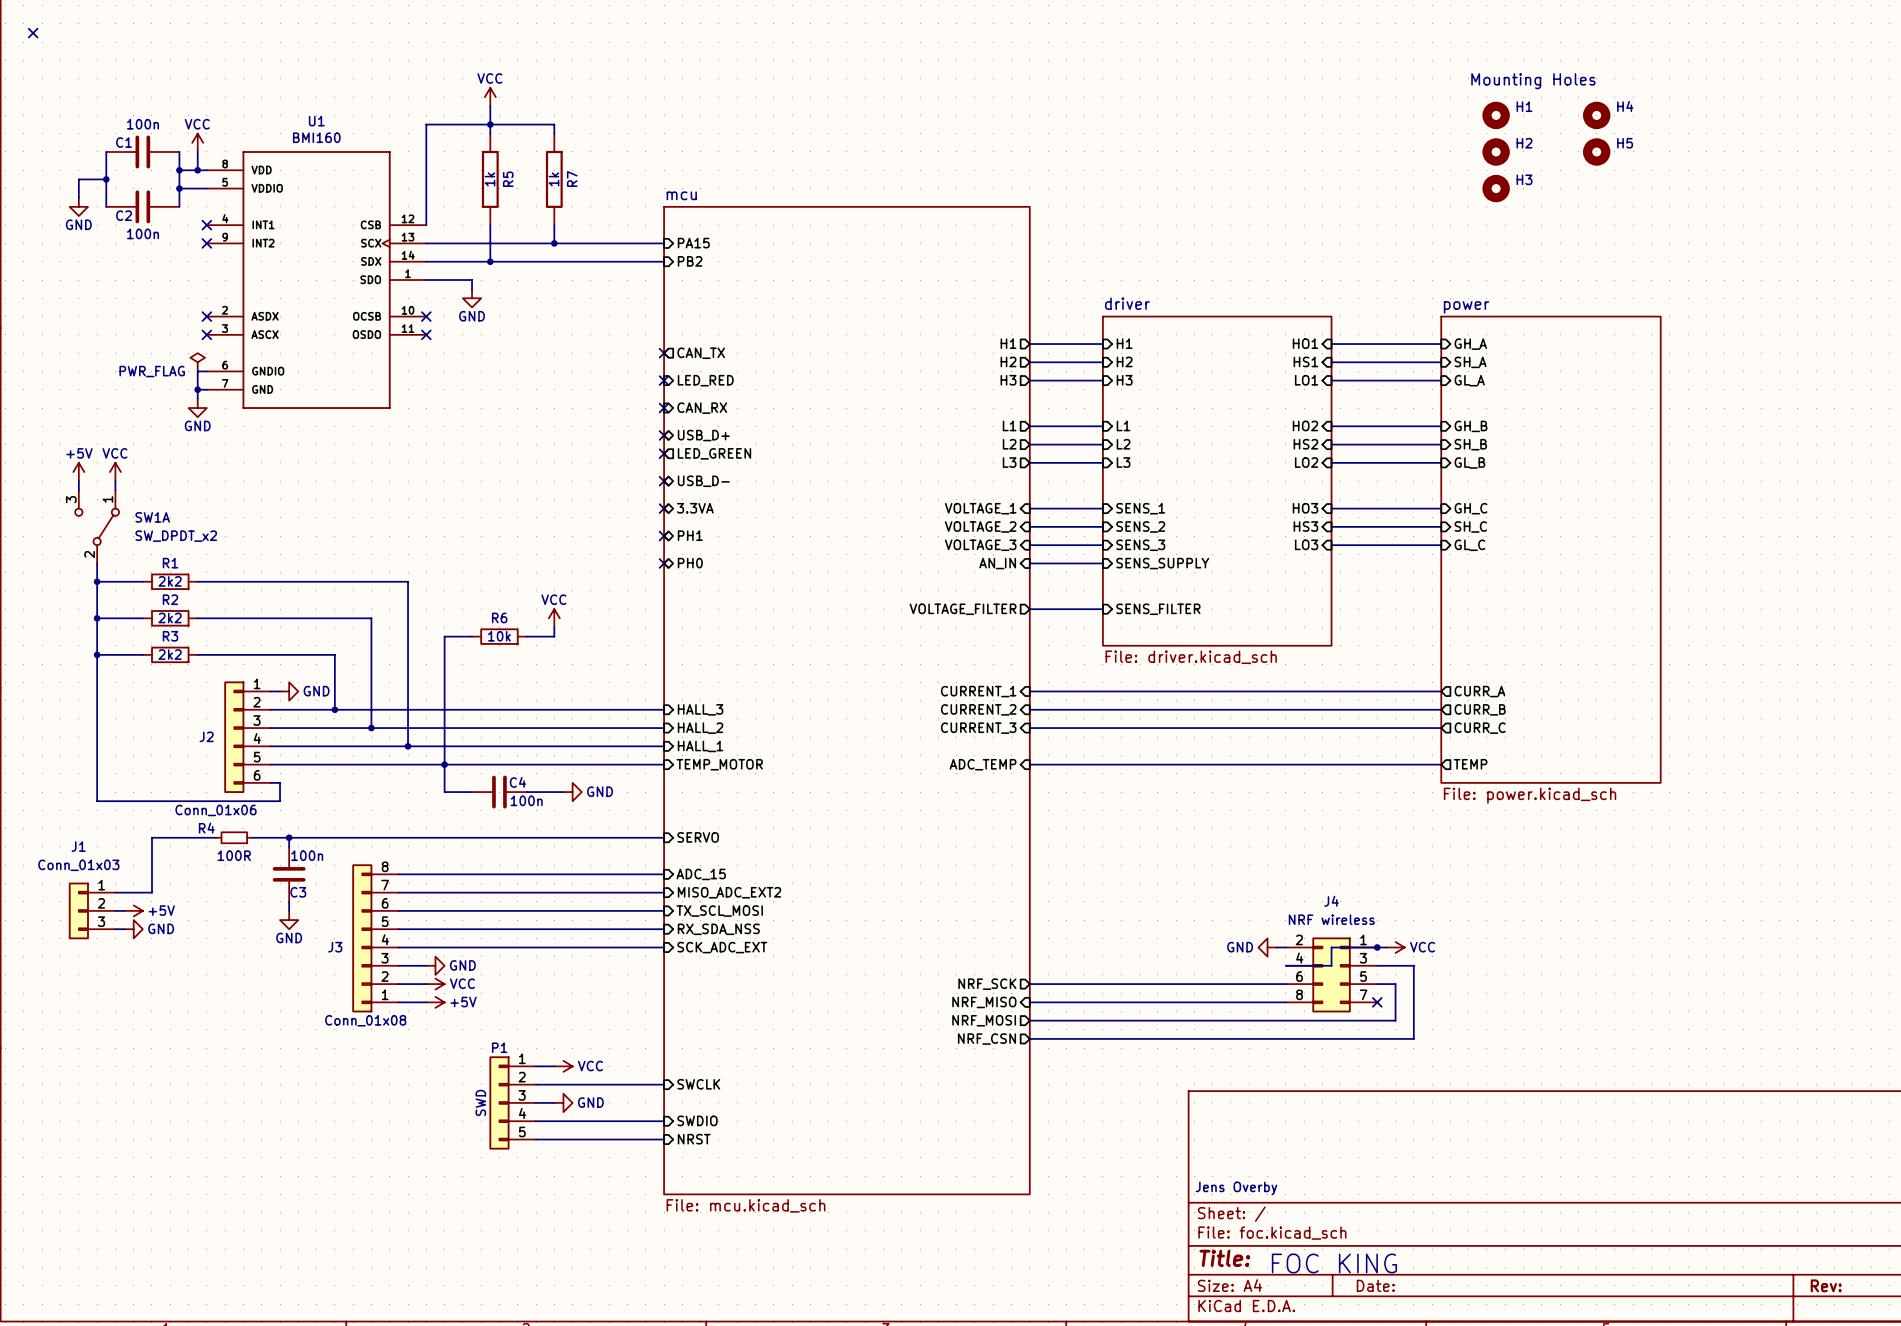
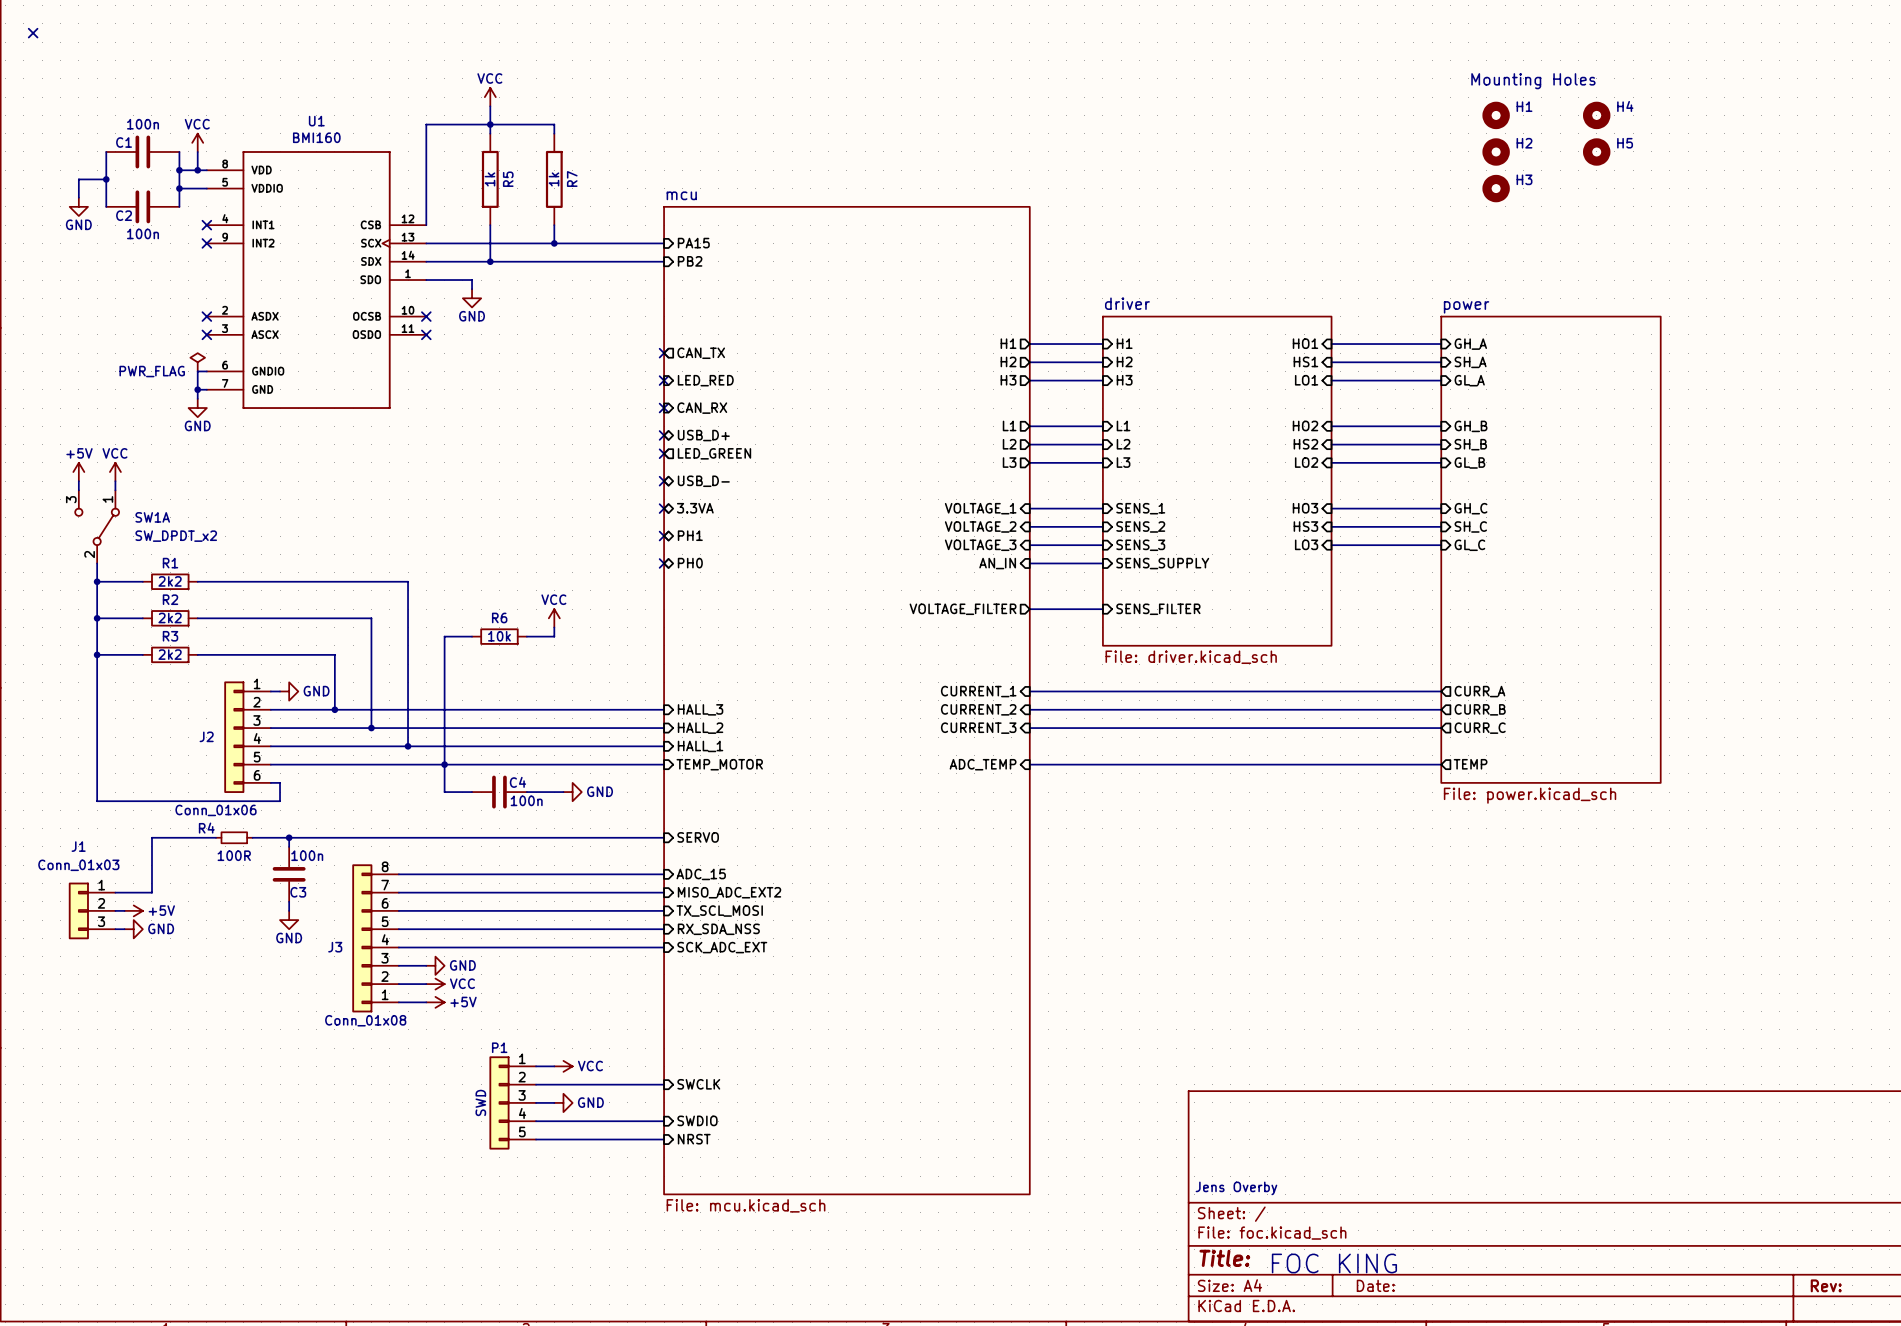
power symbol: GND (1267, 947) -> none
wire: (1276, 947) (1285, 947) -> none
junction: (1377, 947) -> none
wire: (1386, 947) (1331, 947) (1331, 965) (1285, 965) -> none
power symbol: VCC (1395, 947) -> none
wire: (1377, 965) (1413, 965) (1413, 1038) (1029, 1038) -> none
J4: NRF wireless (1331, 974) -> none
sheet pin: NRF_SCK (987, 984) -> none
wire: (1029, 984) (1285, 984) -> none
wire: (1377, 984) (1395, 984) (1395, 1020) (1029, 1020) -> none
sheet pin: NRF_MISO (984, 1002) -> none
wire: (1029, 1002) (1285, 1002) -> none
no-connect mark: (1377, 1002) -> none
sheet pin: NRF_MOSI (984, 1020) -> none
sheet pin: NRF_CSN (986, 1039) -> none

